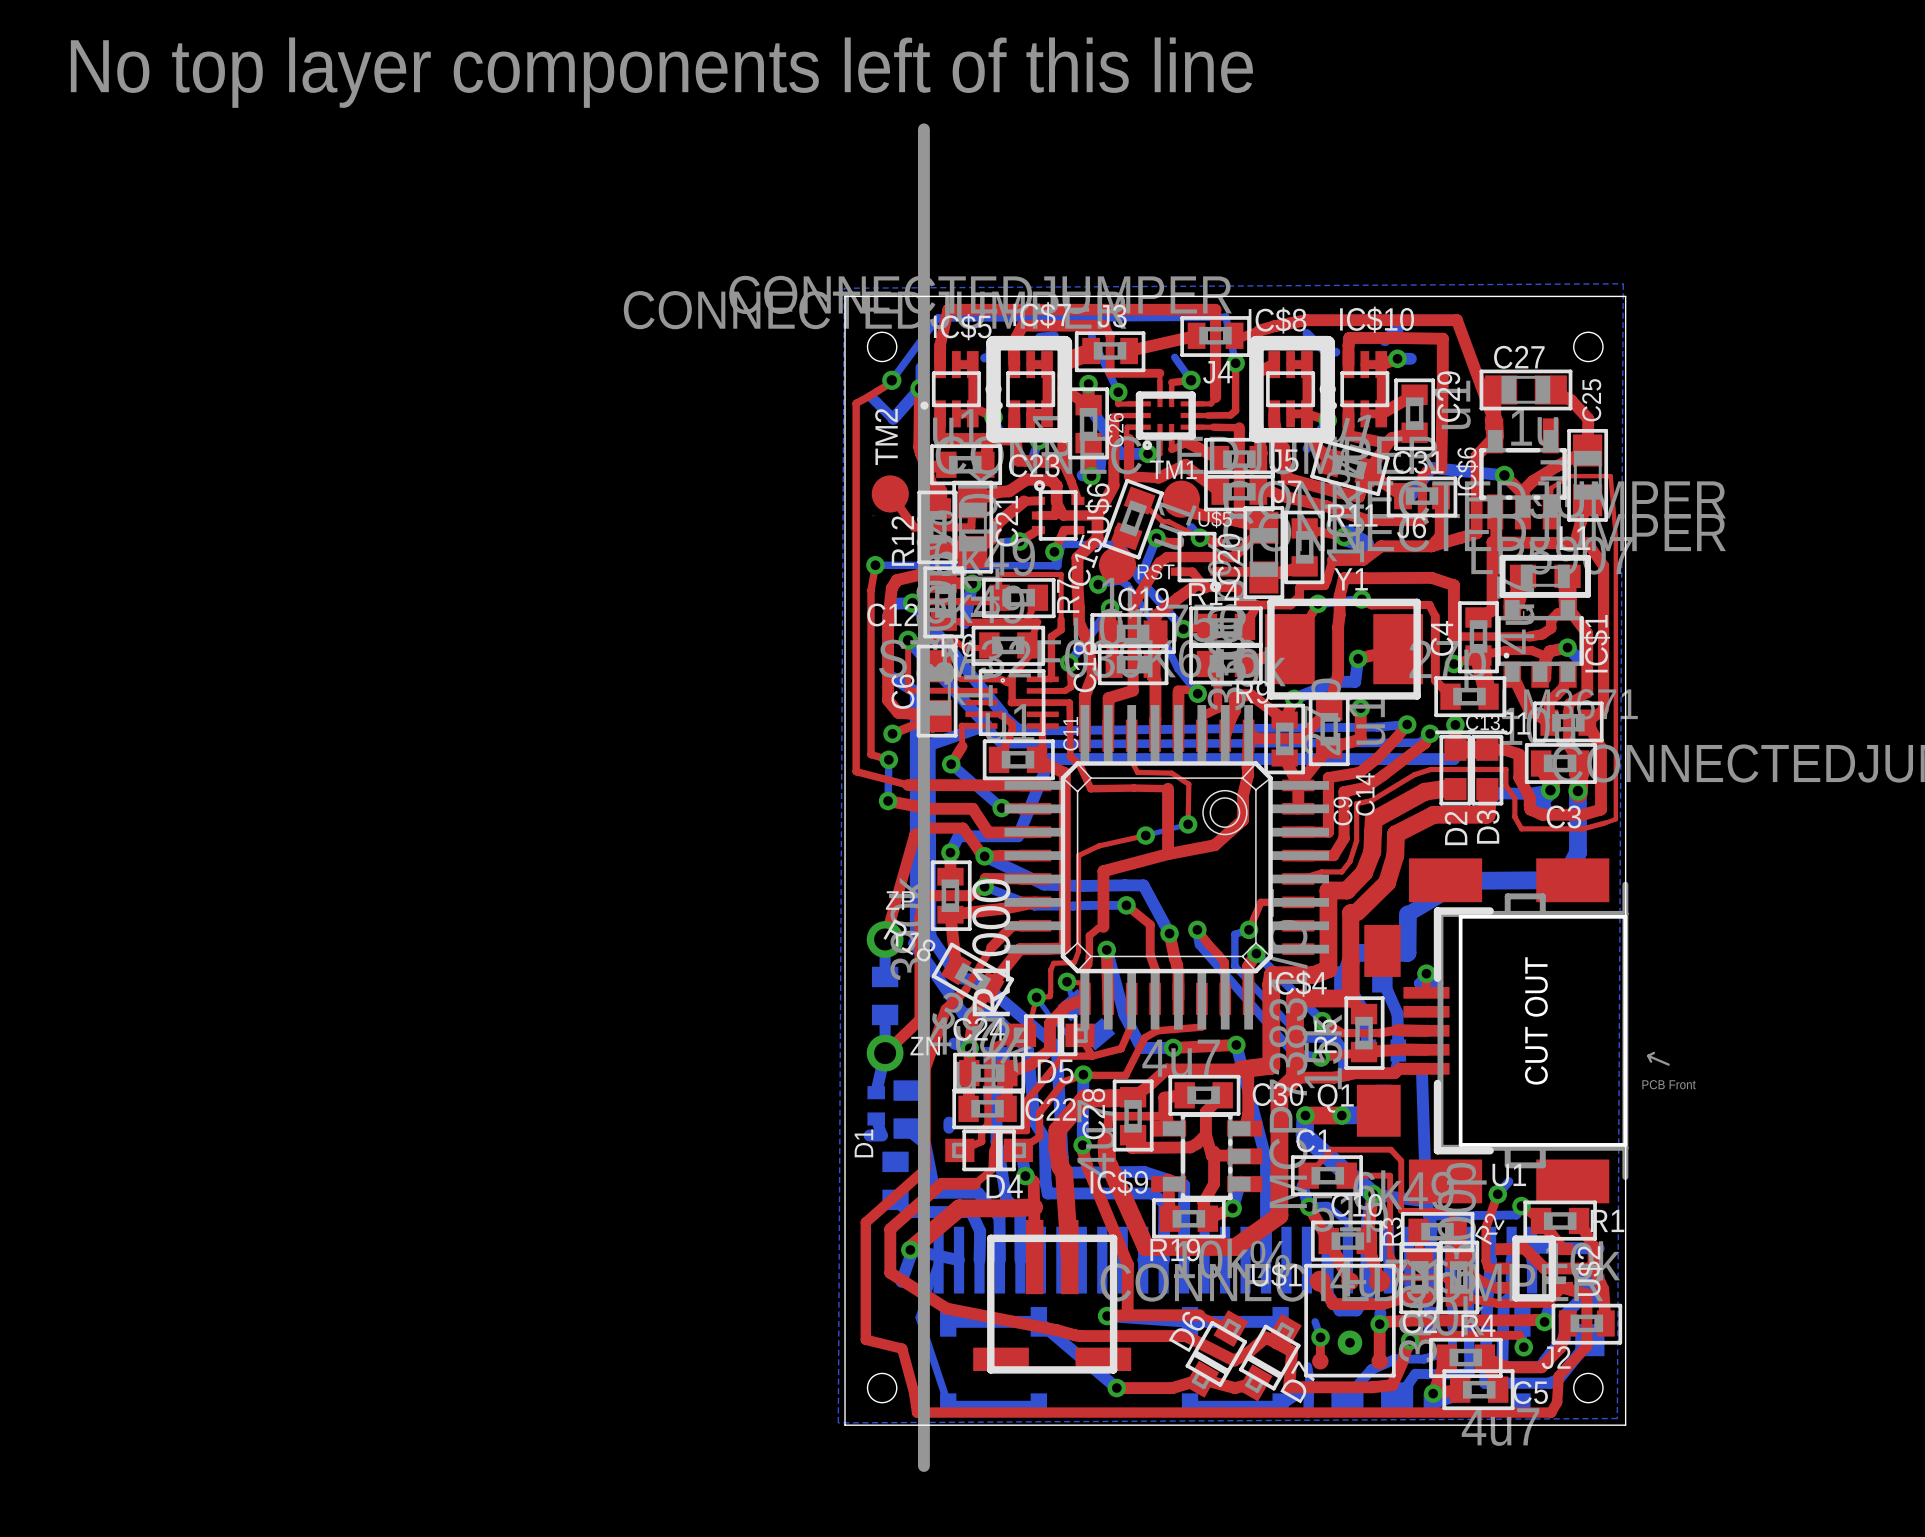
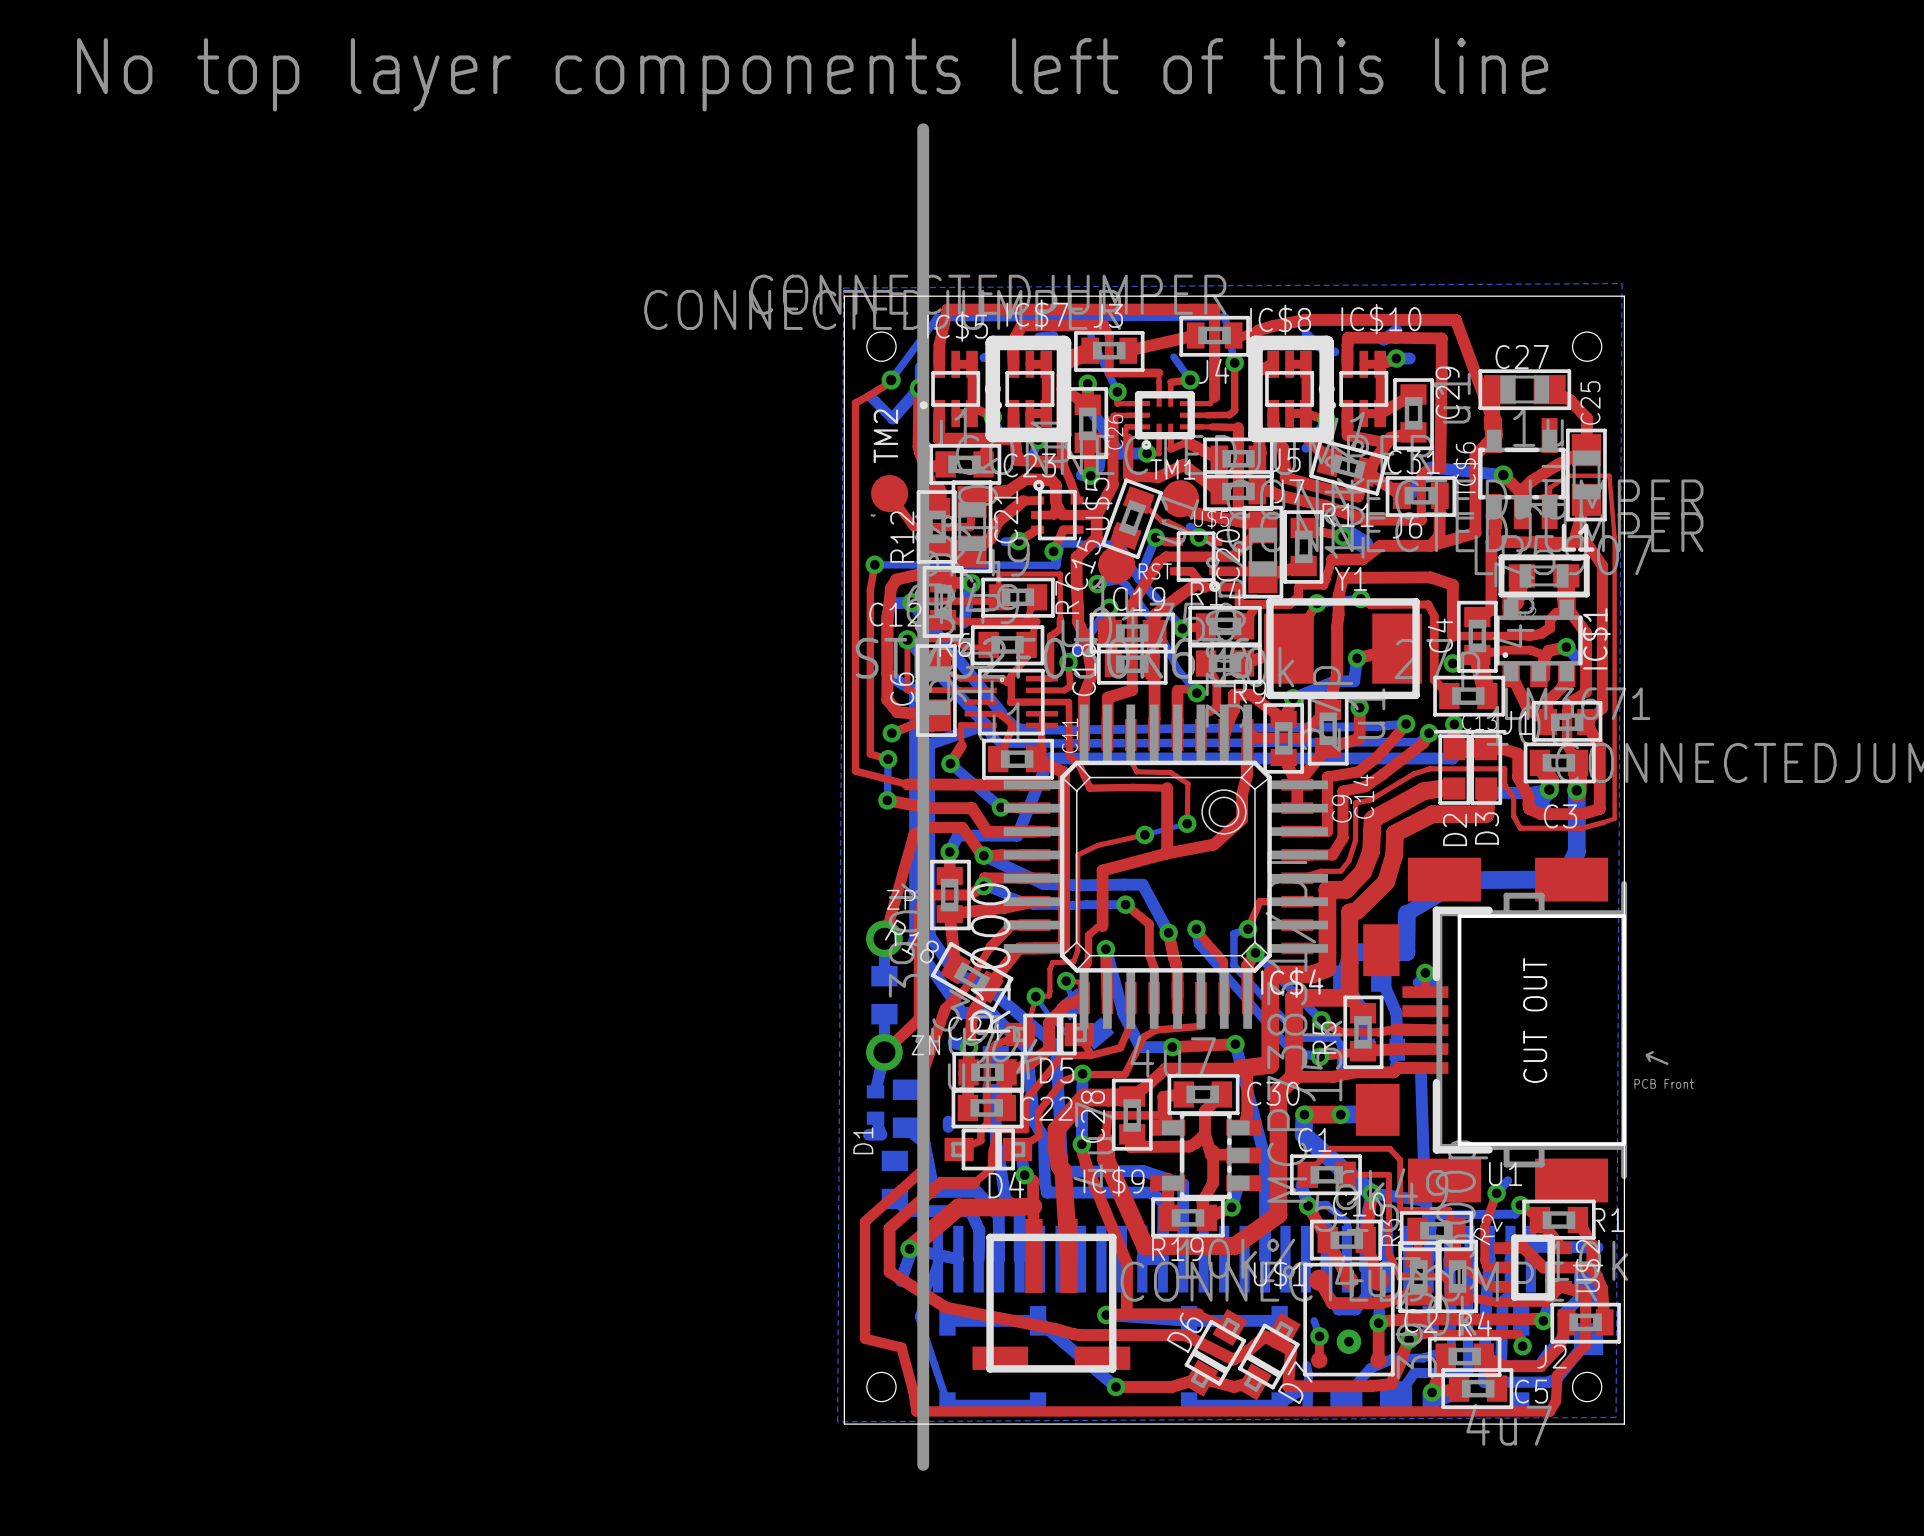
U$6 name: U$6 (1098, 508) -> U$5 (1097, 503)
Q1 name: Q1 (1335, 1098) -> none

